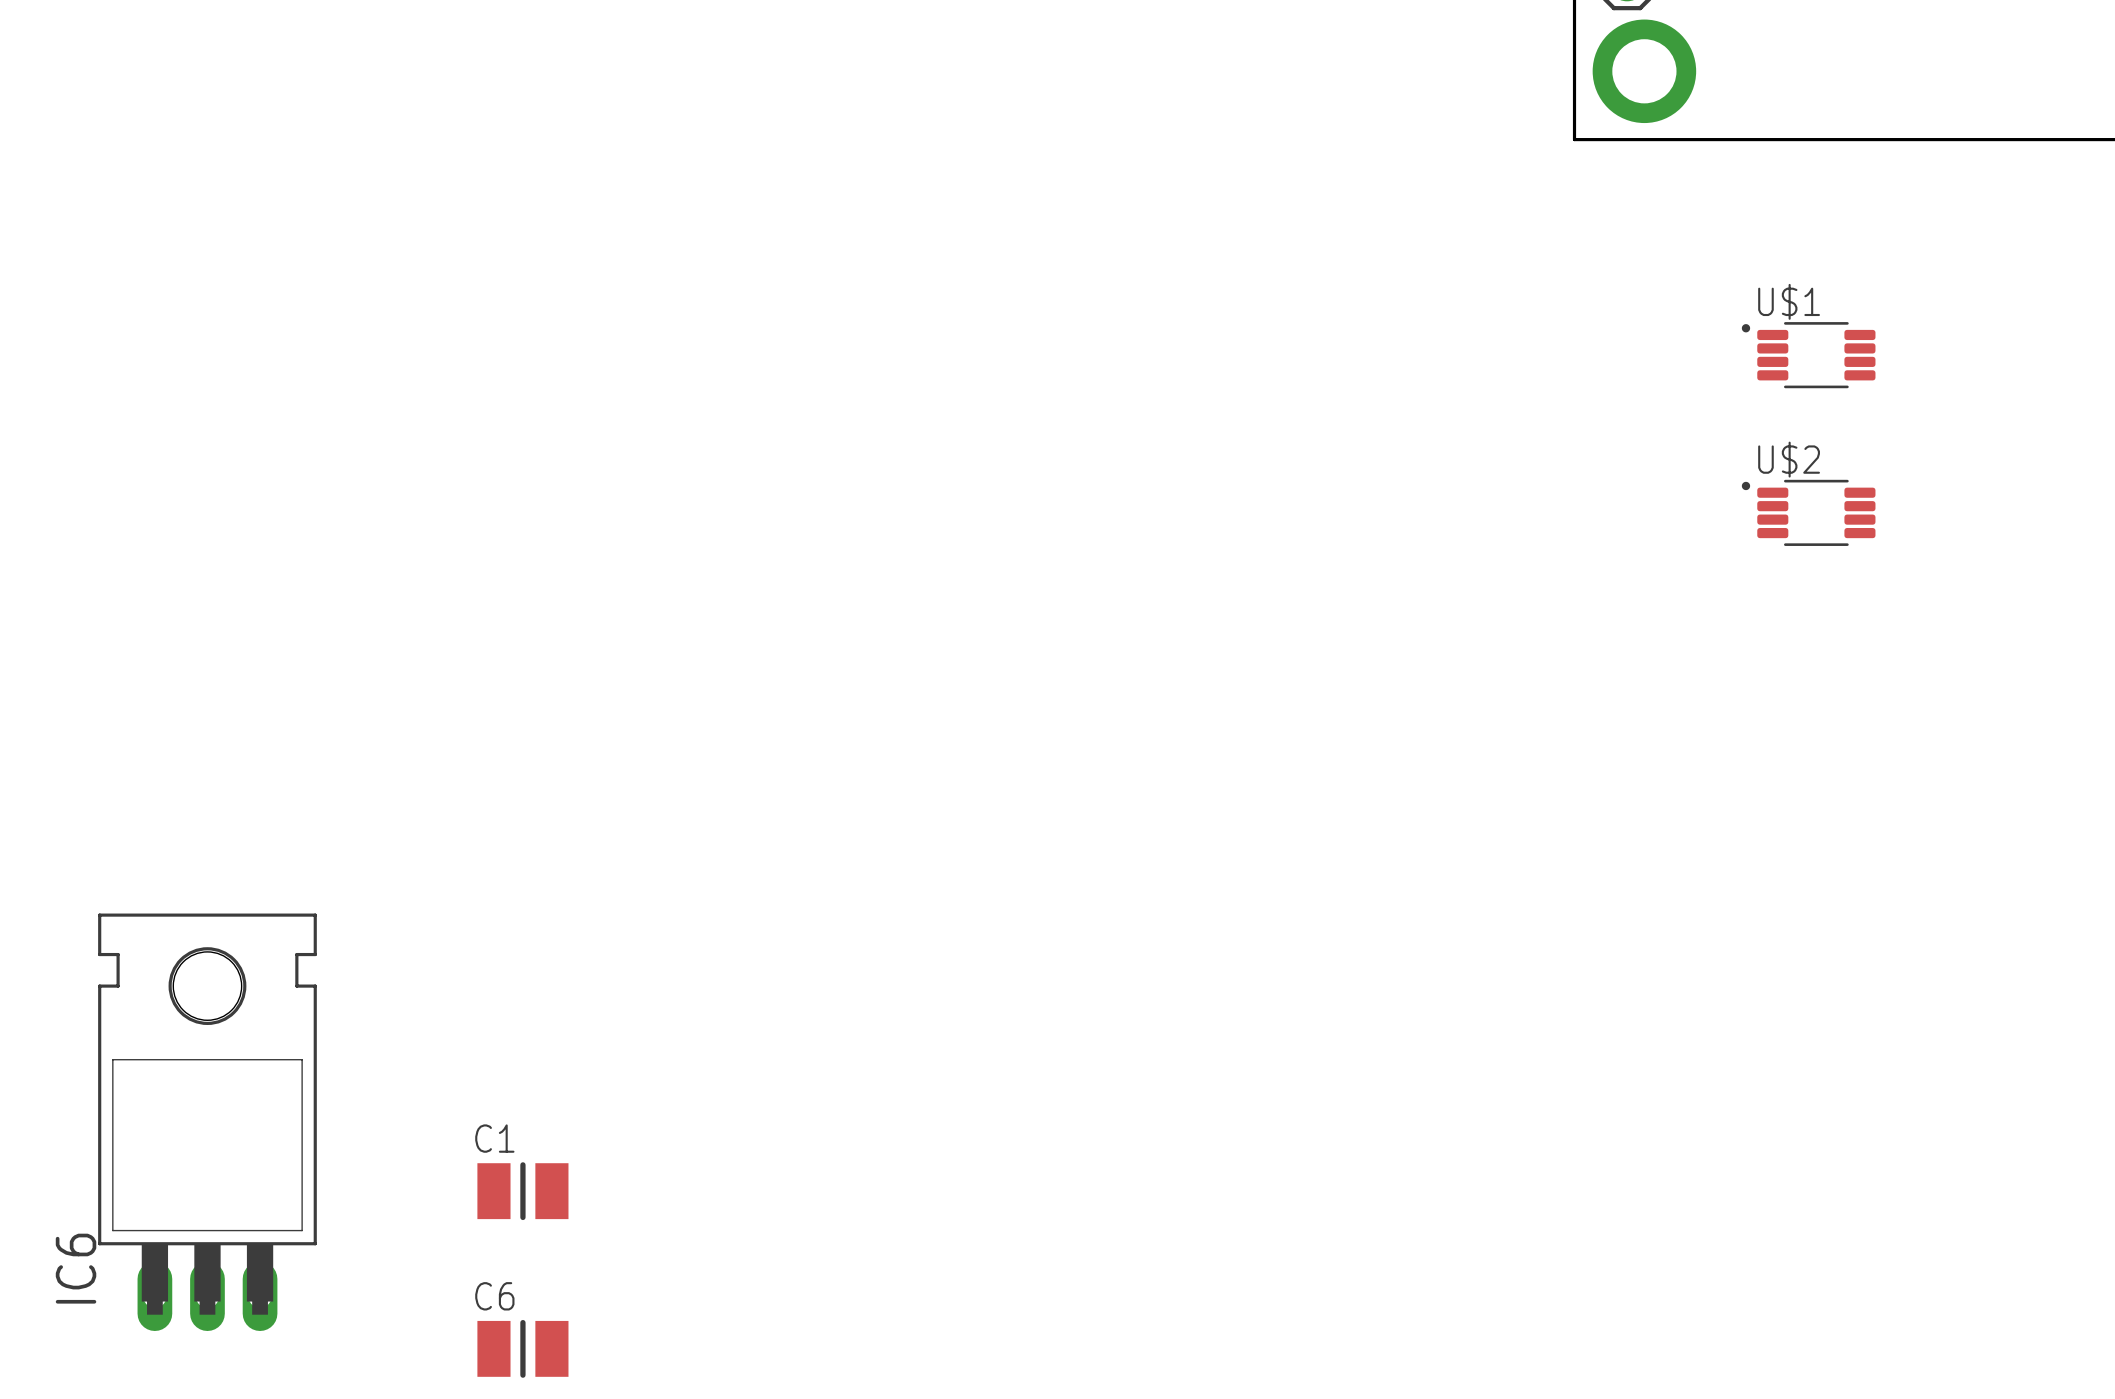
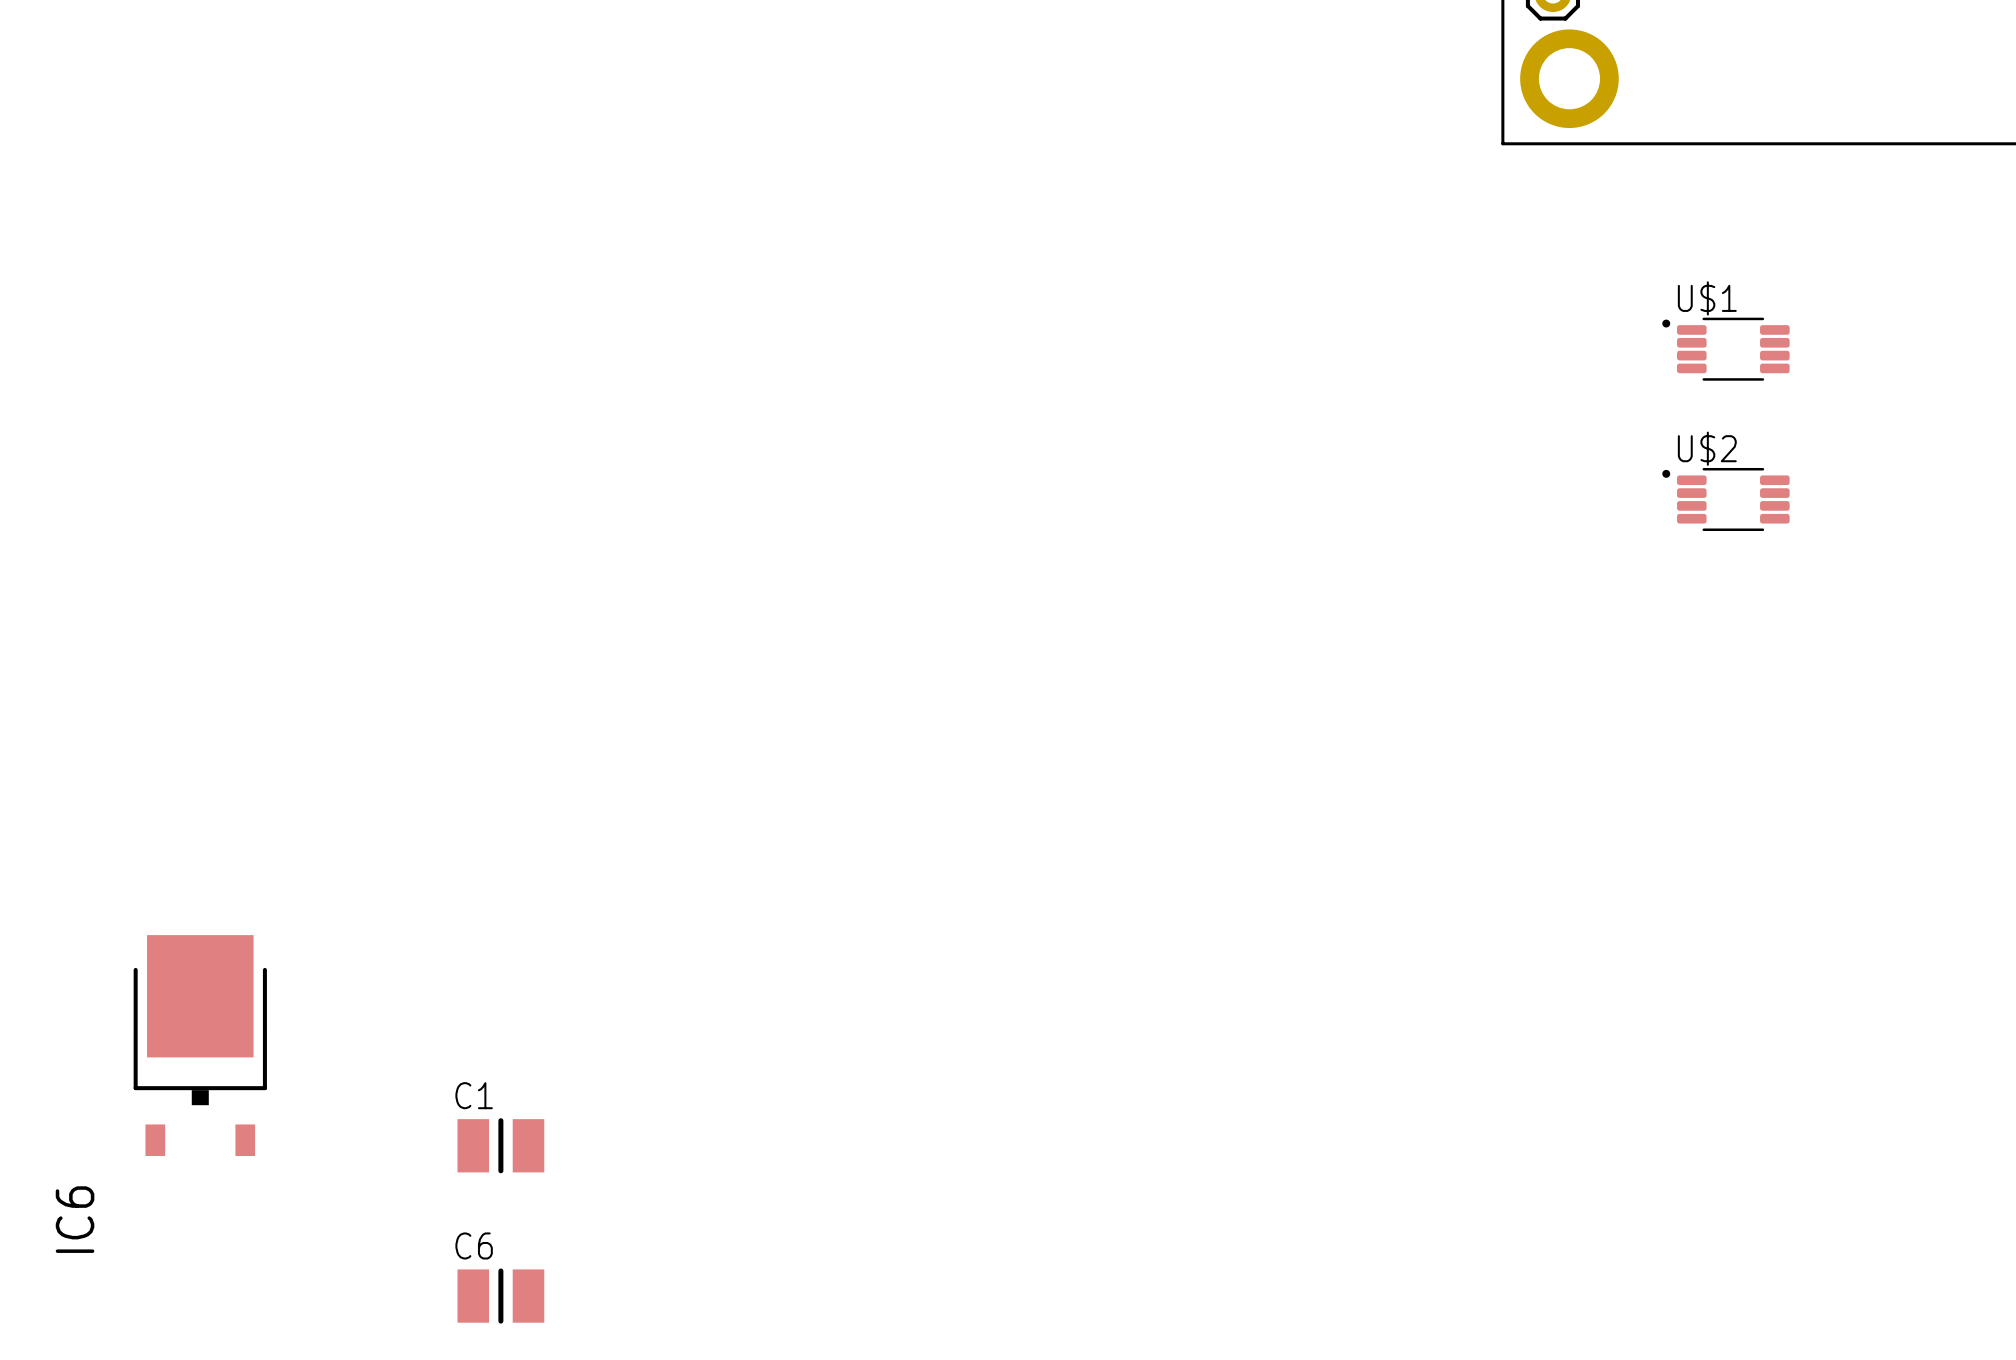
IC6 footprint: [98, 913, 317, 1332] -> [133, 935, 267, 1157]

